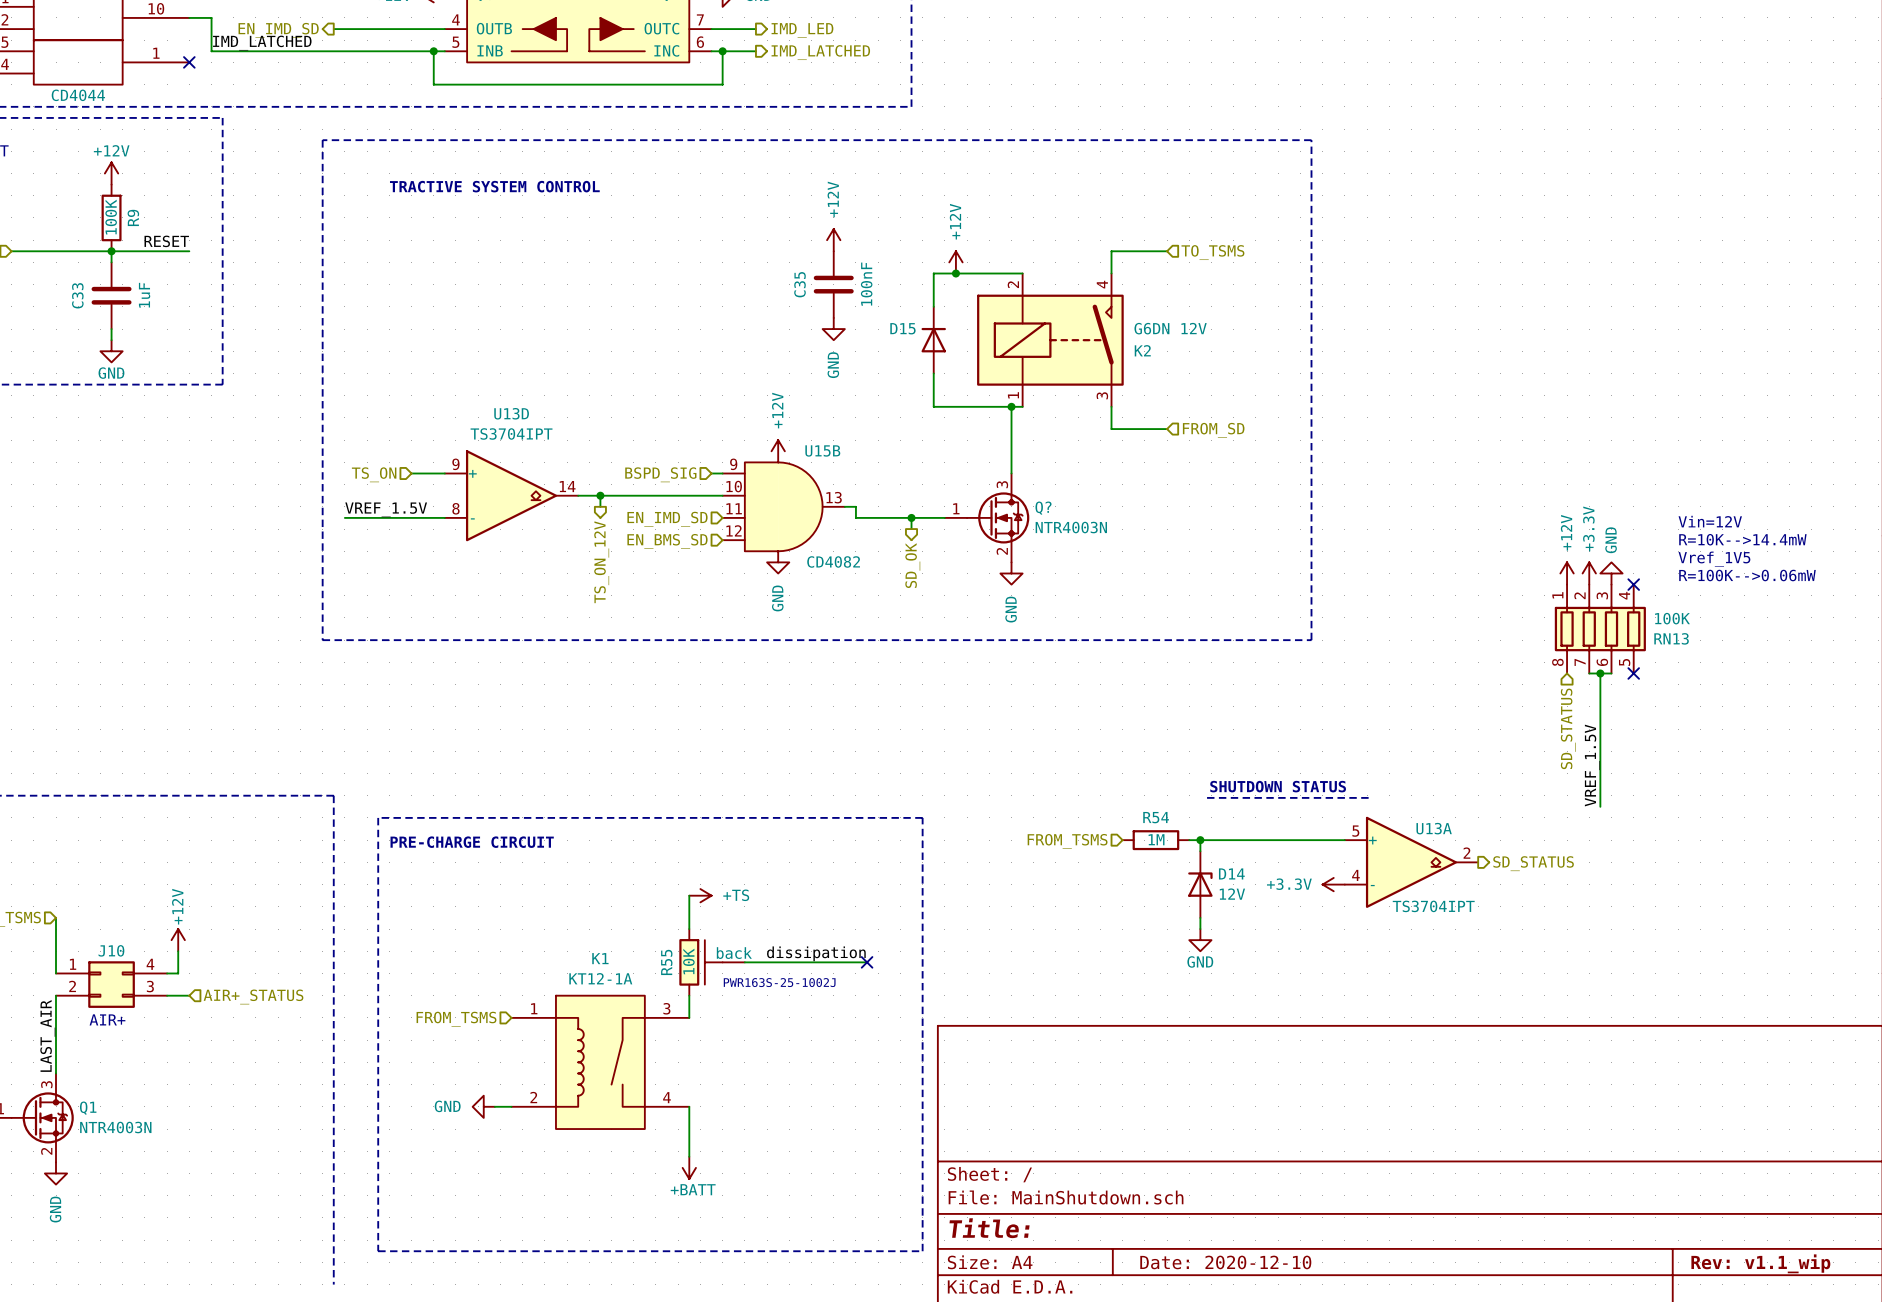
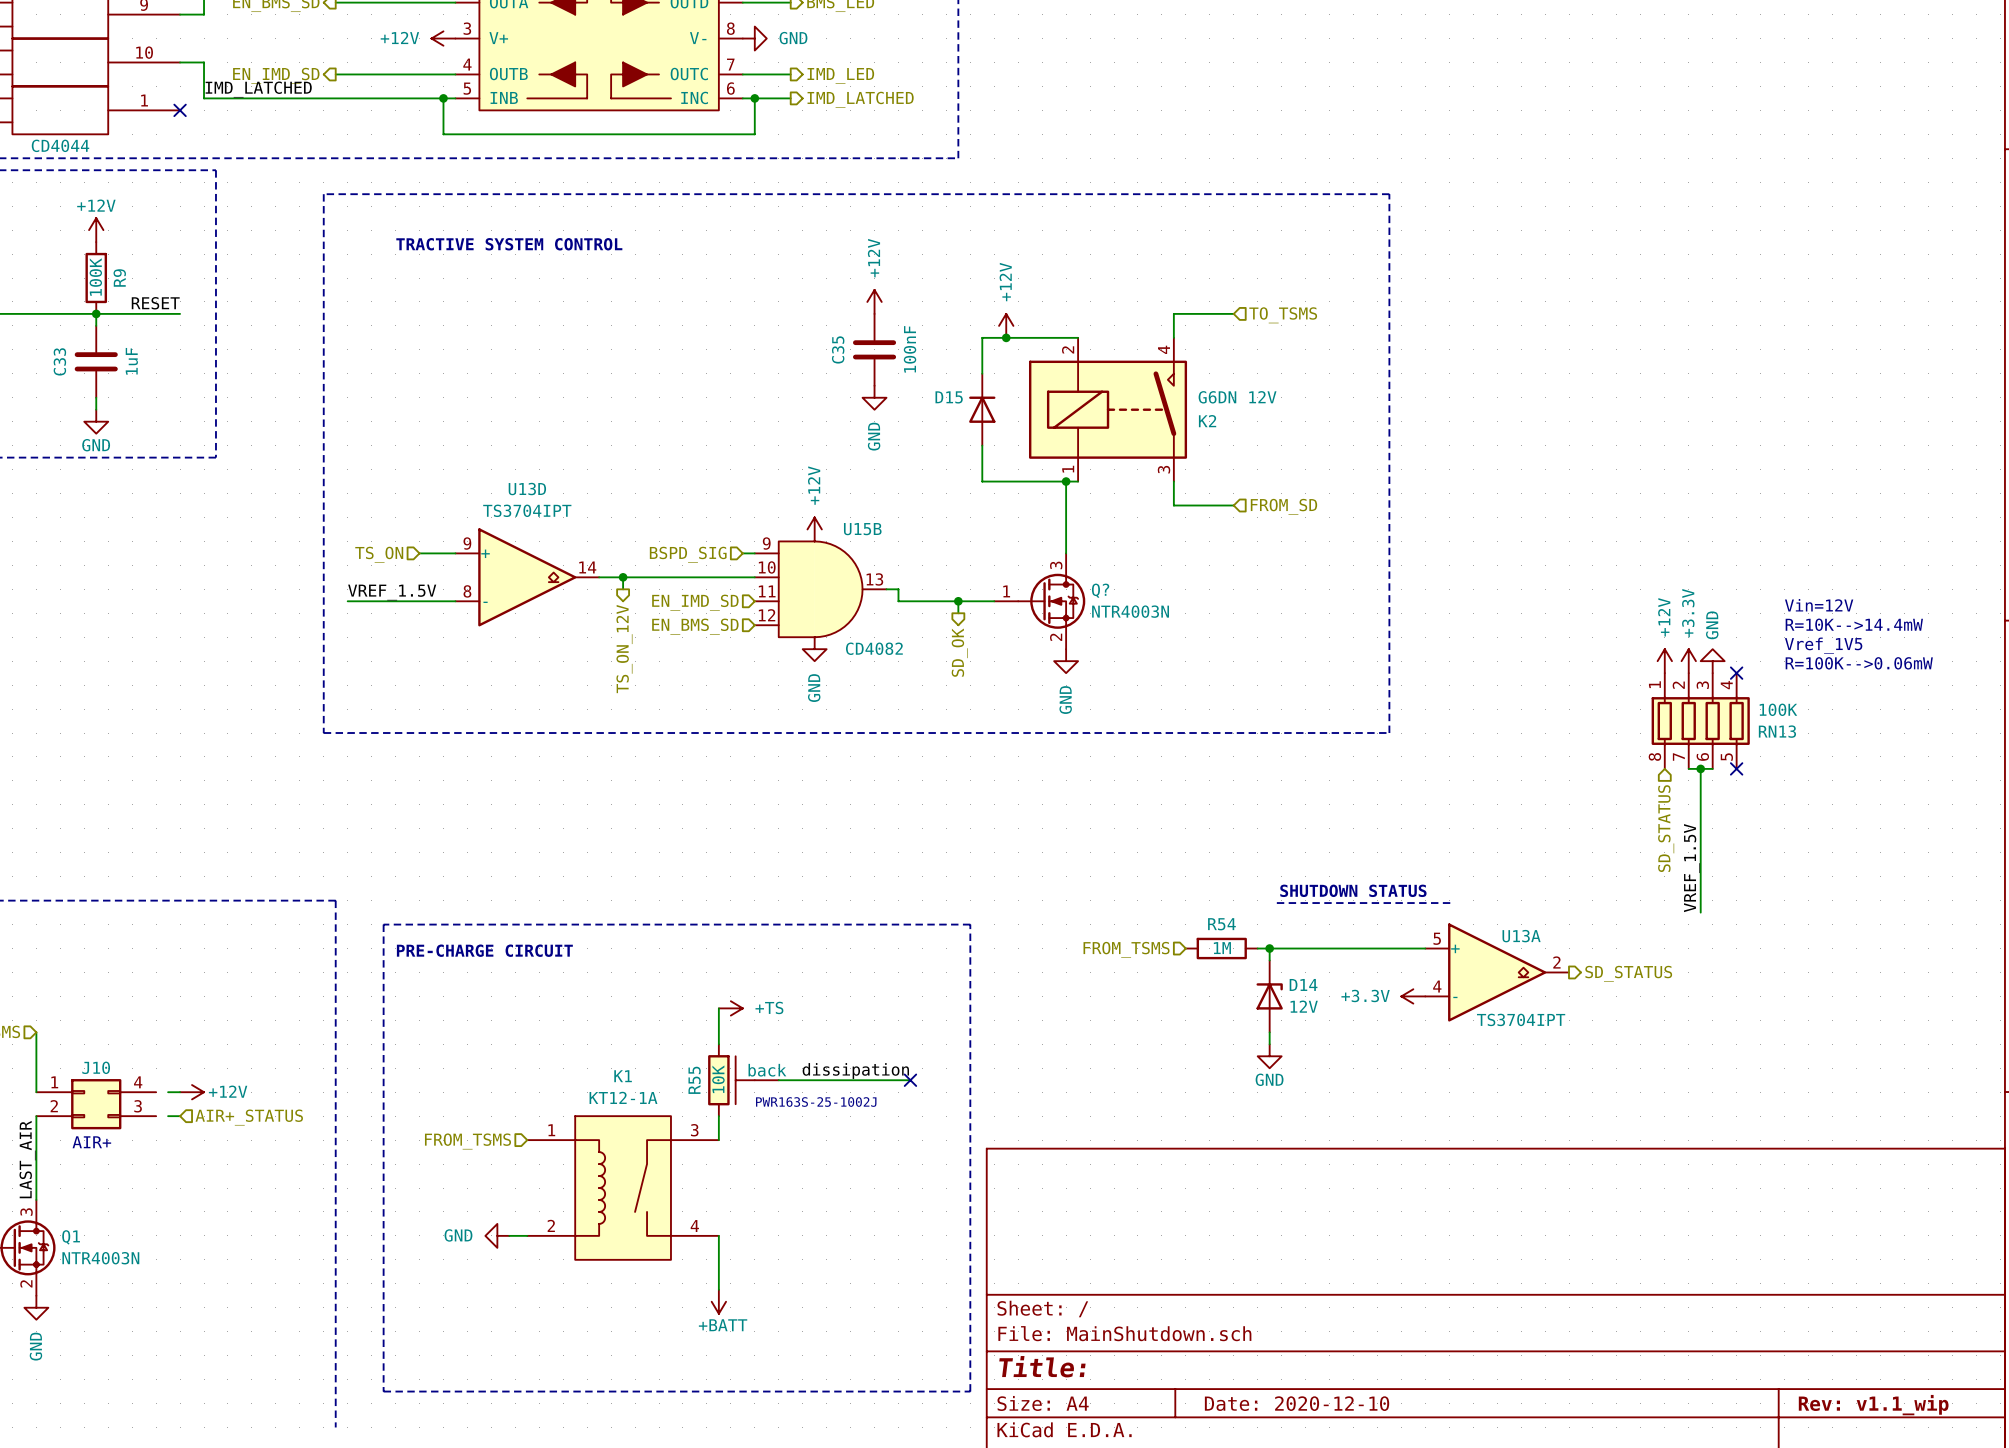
power symbol rotation: 0° (178, 940) -> 90° clockwise (192, 1092)
power symbol position: +12V (178, 940) -> +12V (192, 1092)
wire: (178, 951) (178, 973) (167, 973) -> none
wire: (167, 995) (178, 995) -> (168, 1092) (180, 1092)

